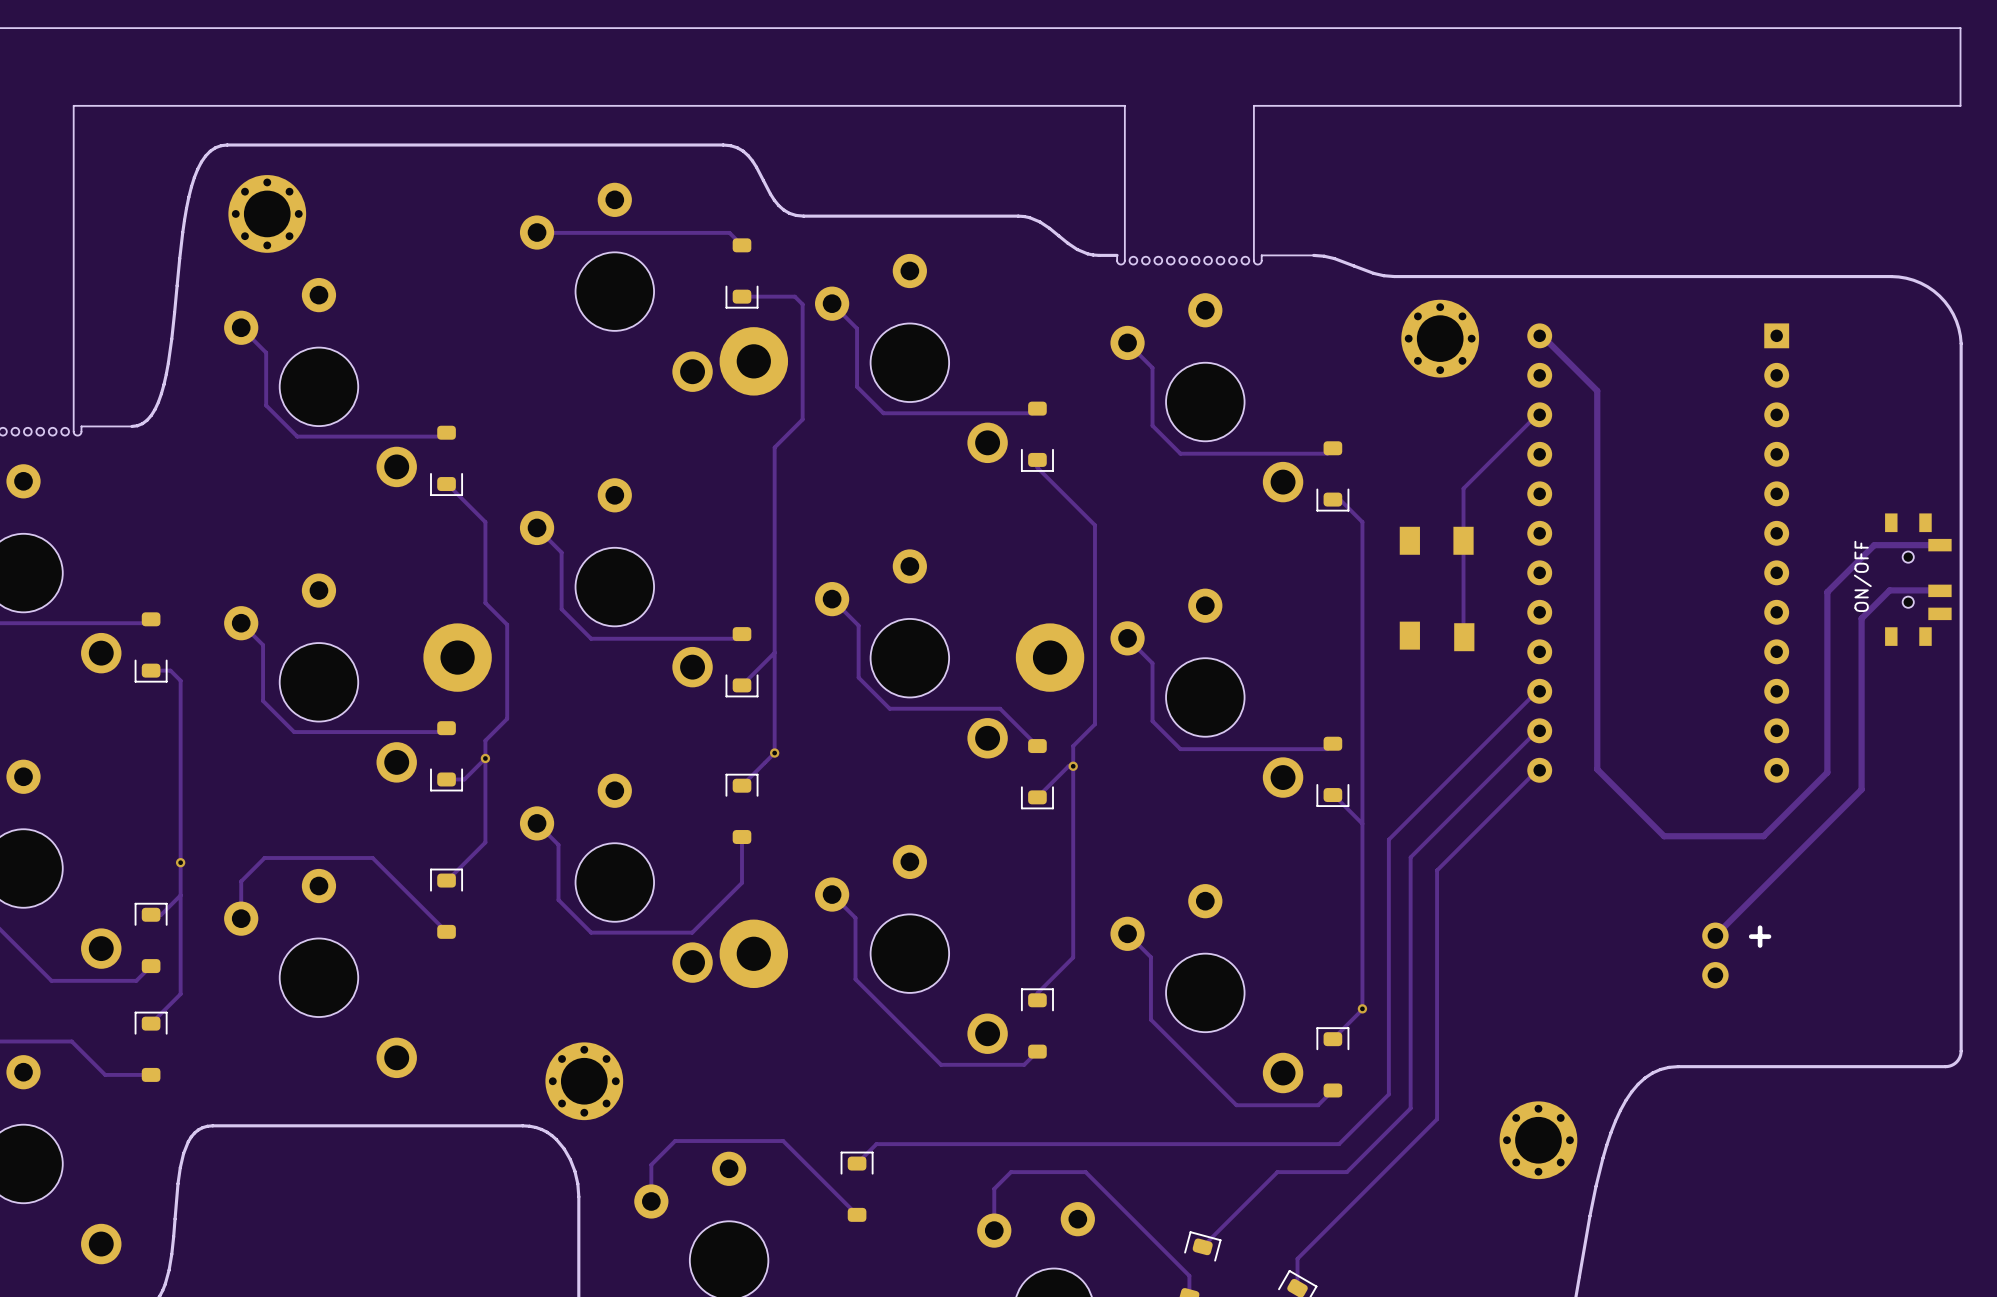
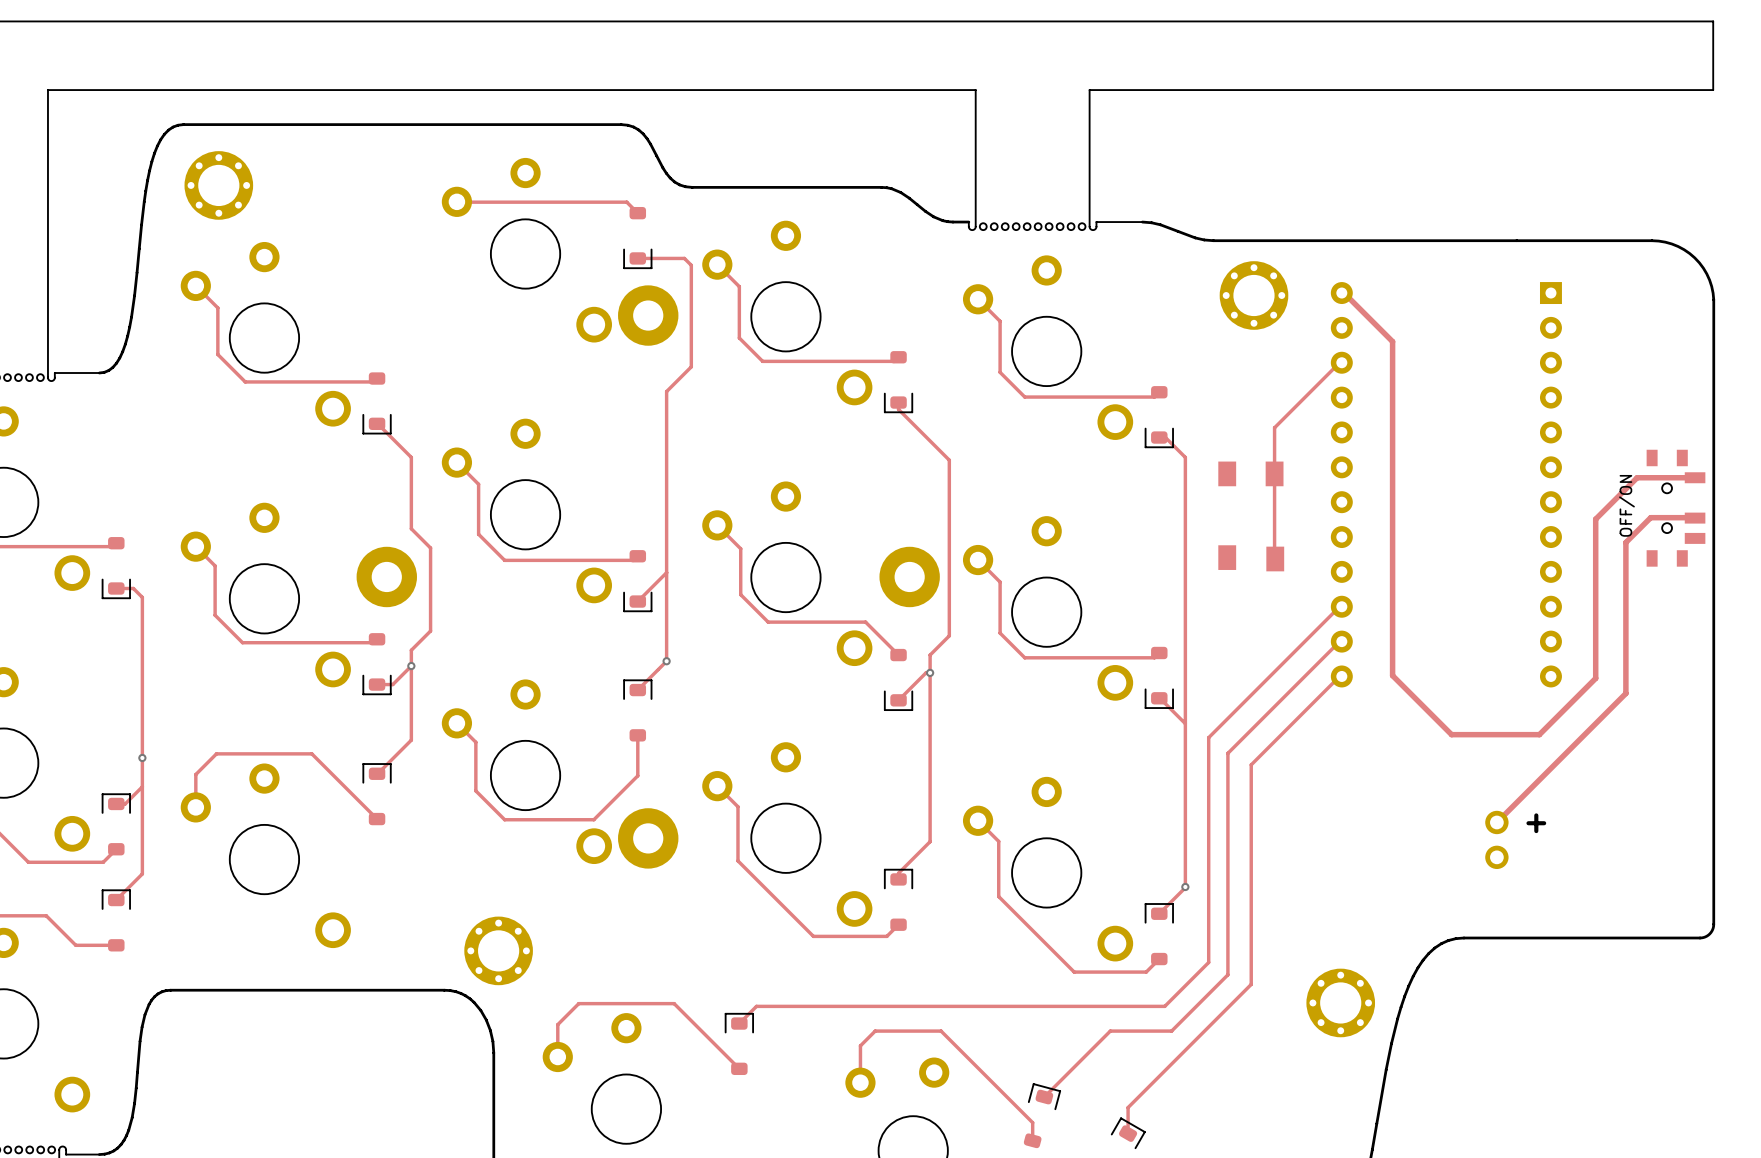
part text: ON/OFF (1862, 576) -> OFF/ON (1626, 505)

